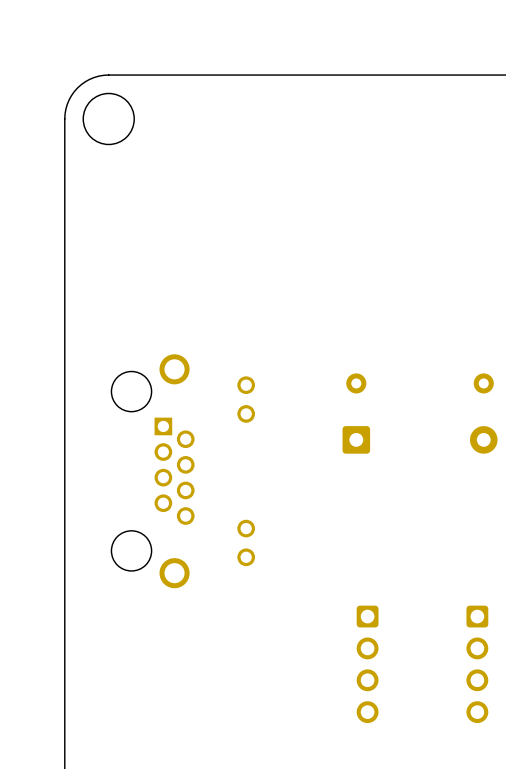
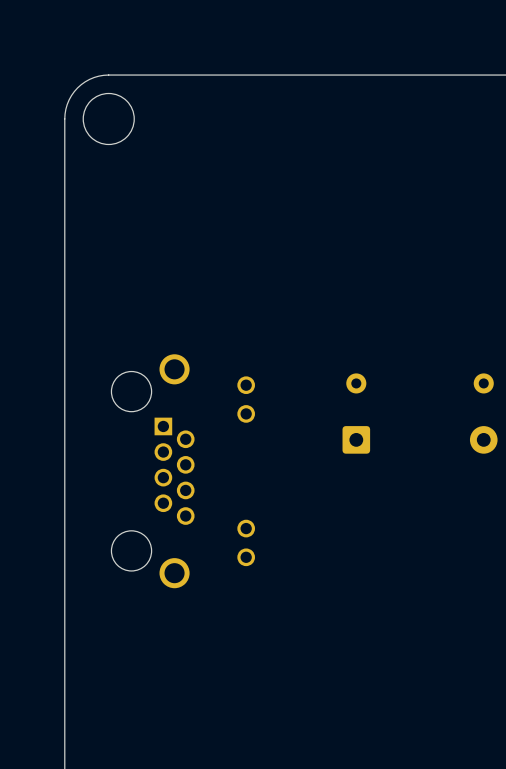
part: (367, 664) -> none
part: (477, 664) -> none

